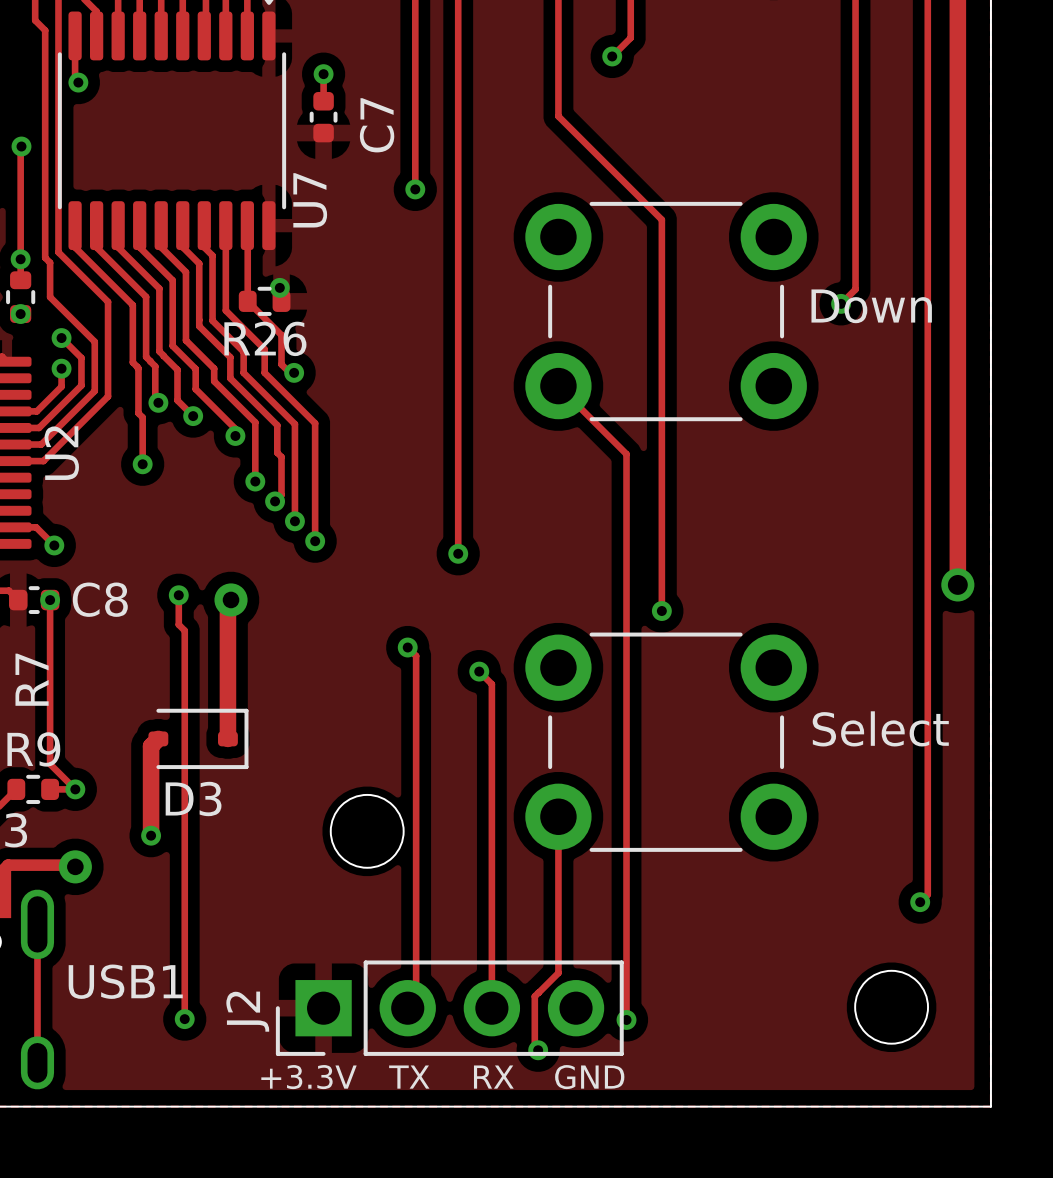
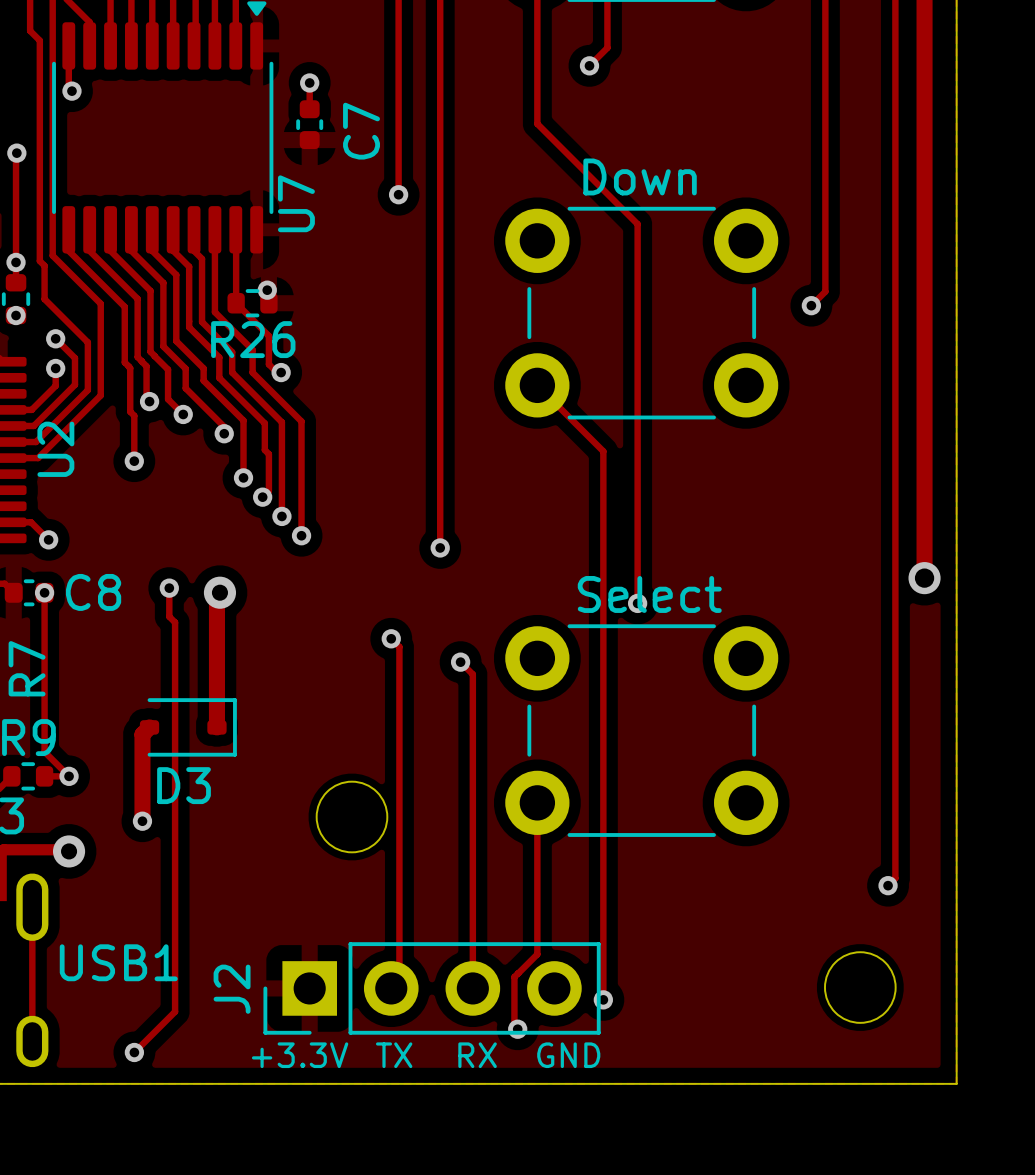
part value position: Down (871, 306) -> Down (640, 176)
part value position: Select (880, 728) -> Select (649, 594)
track: none -> (175, 999) (175, 1011) (134, 1052)
via position: (184, 1019) -> (134, 1052)

